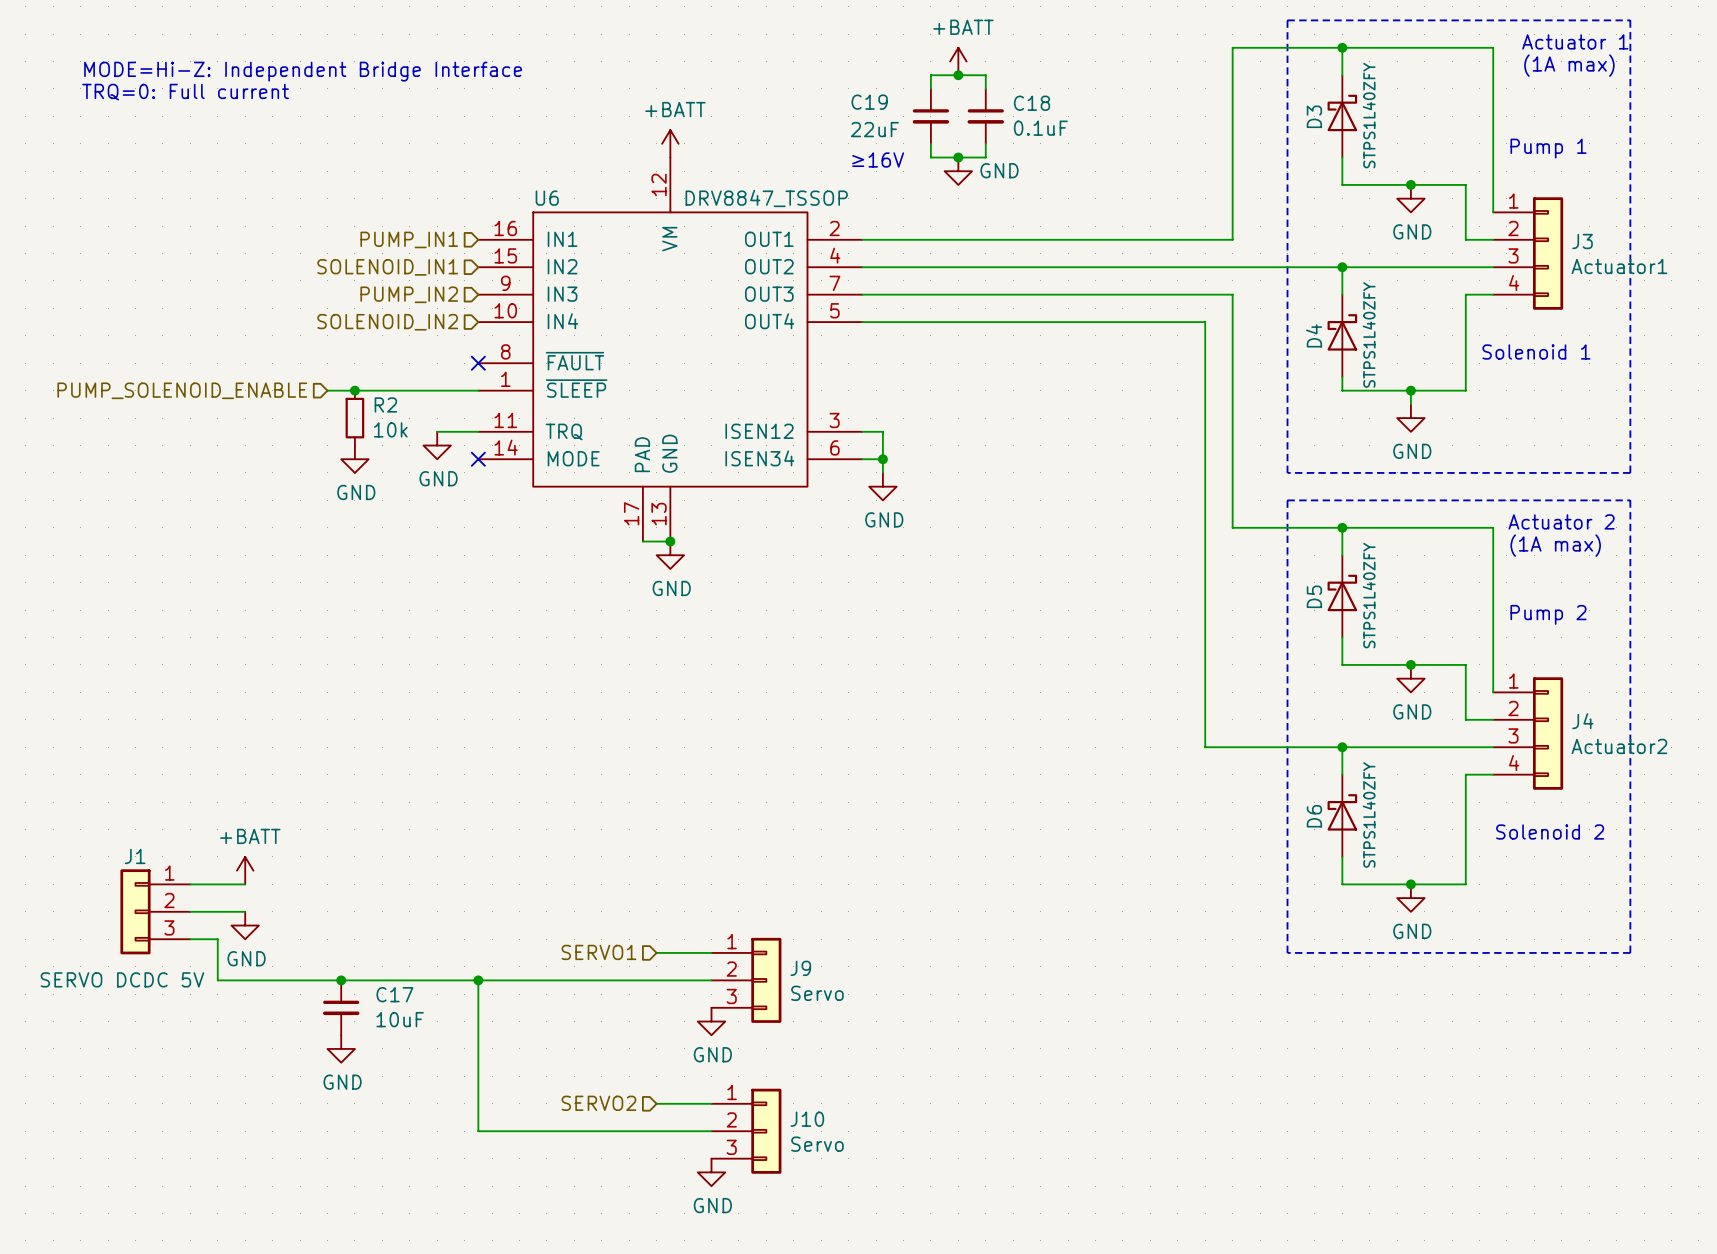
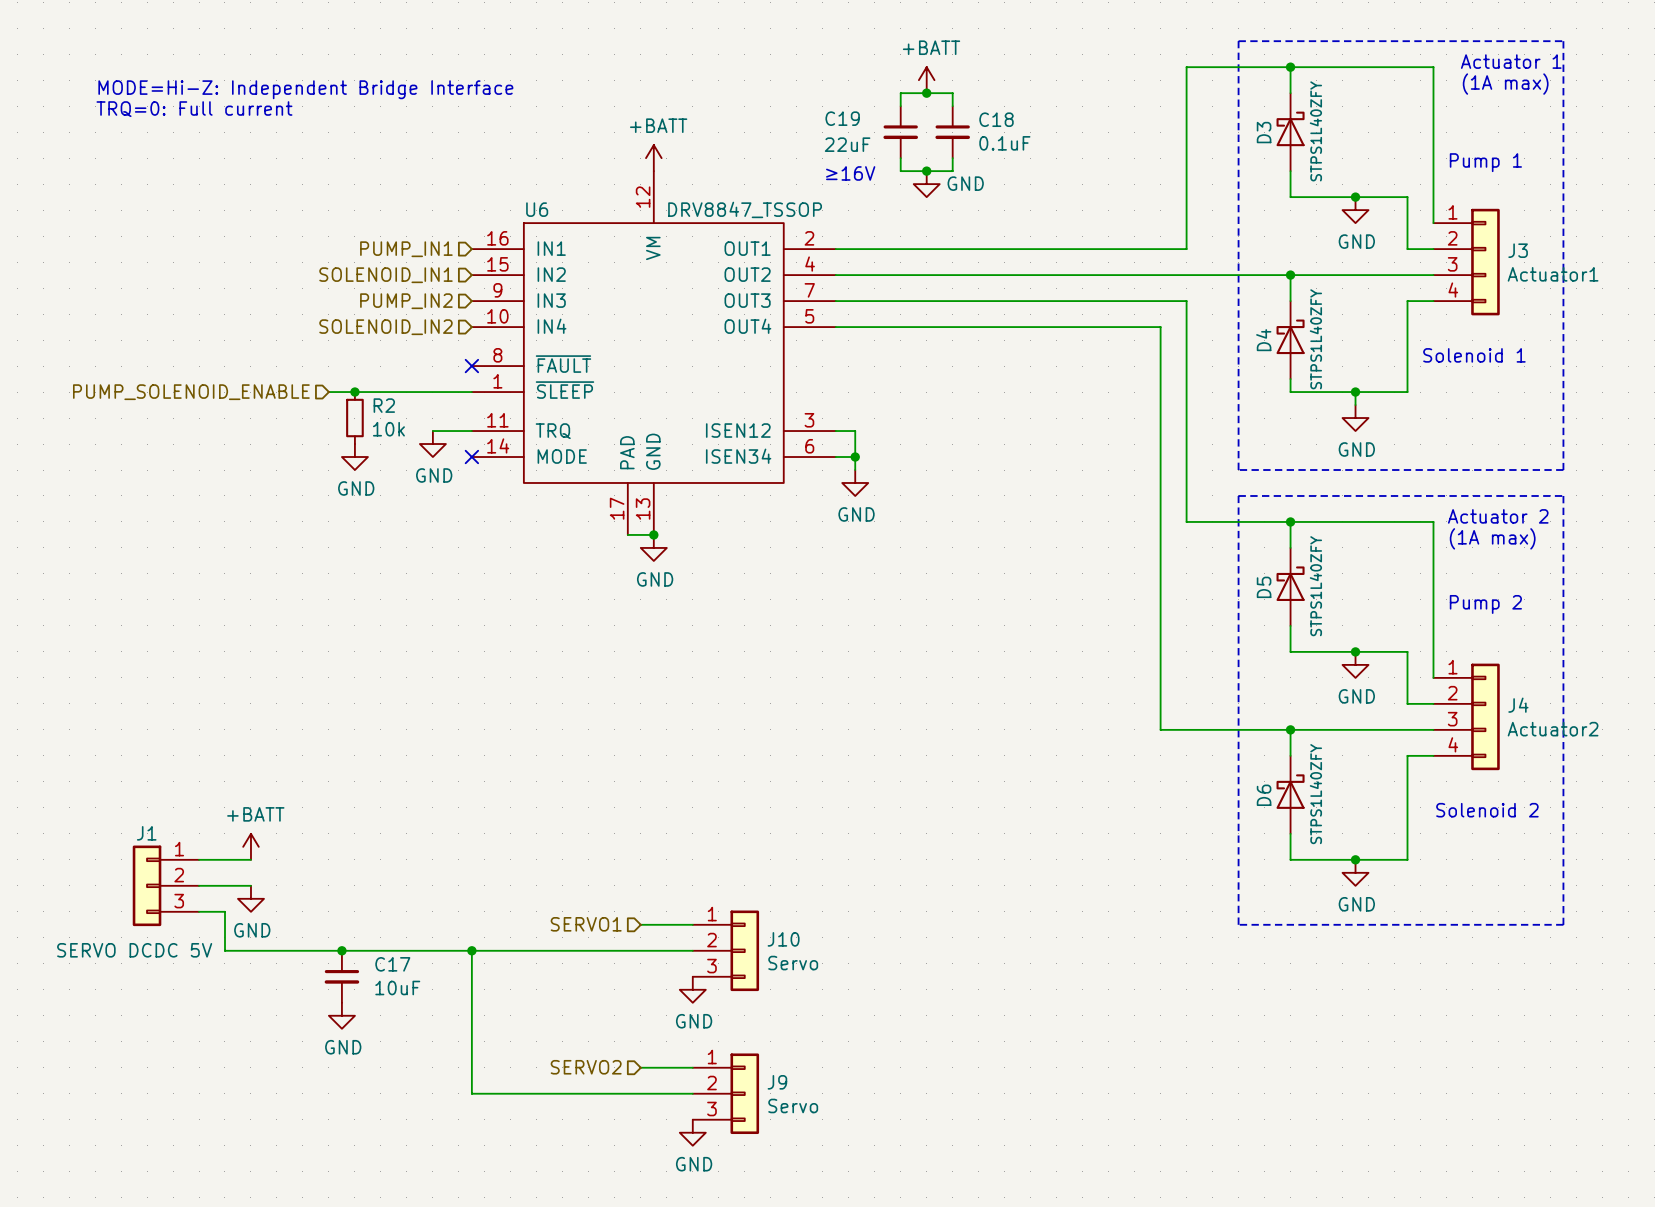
J9 name: J9 (800, 968) -> J10 (783, 939)
J10 name: J10 (807, 1119) -> J9 (777, 1082)

